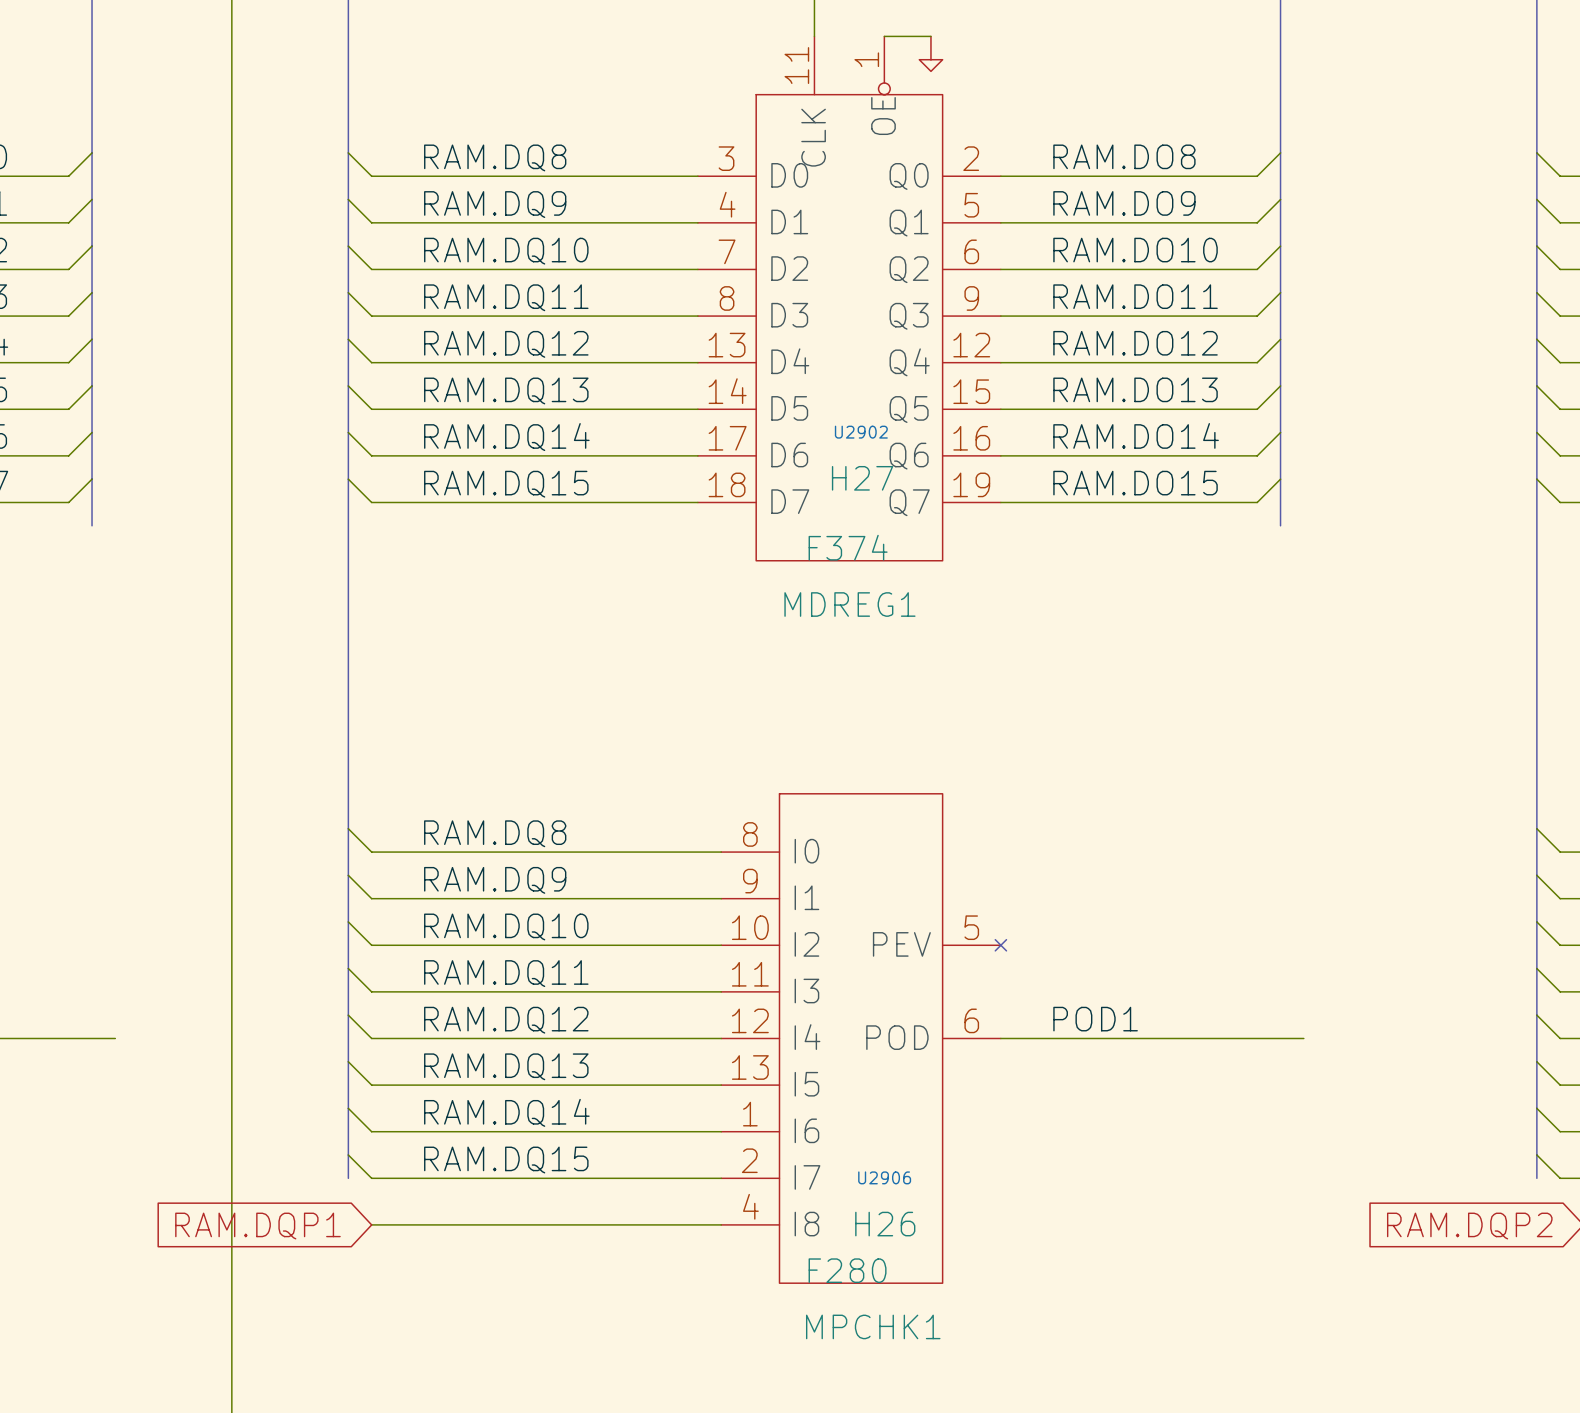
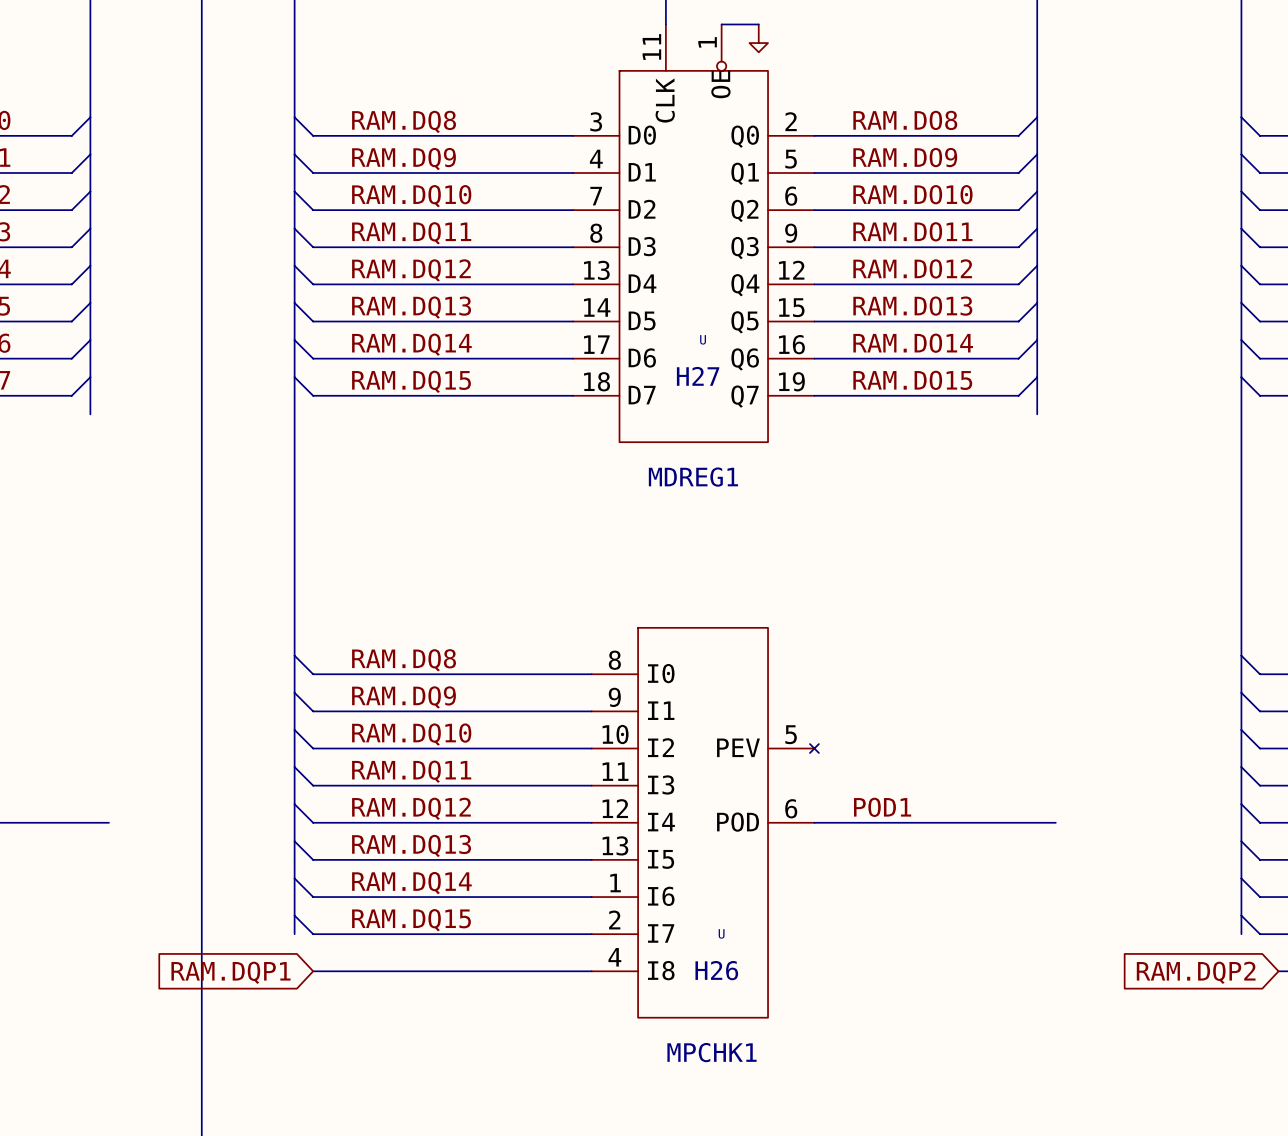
U2902 name: U2902 (861, 432) -> U (703, 339)
U2902 value: F374 (848, 547) -> none
U2906 name: U2906 (884, 1177) -> U (721, 933)
U2906 value: F280 (847, 1270) -> none

